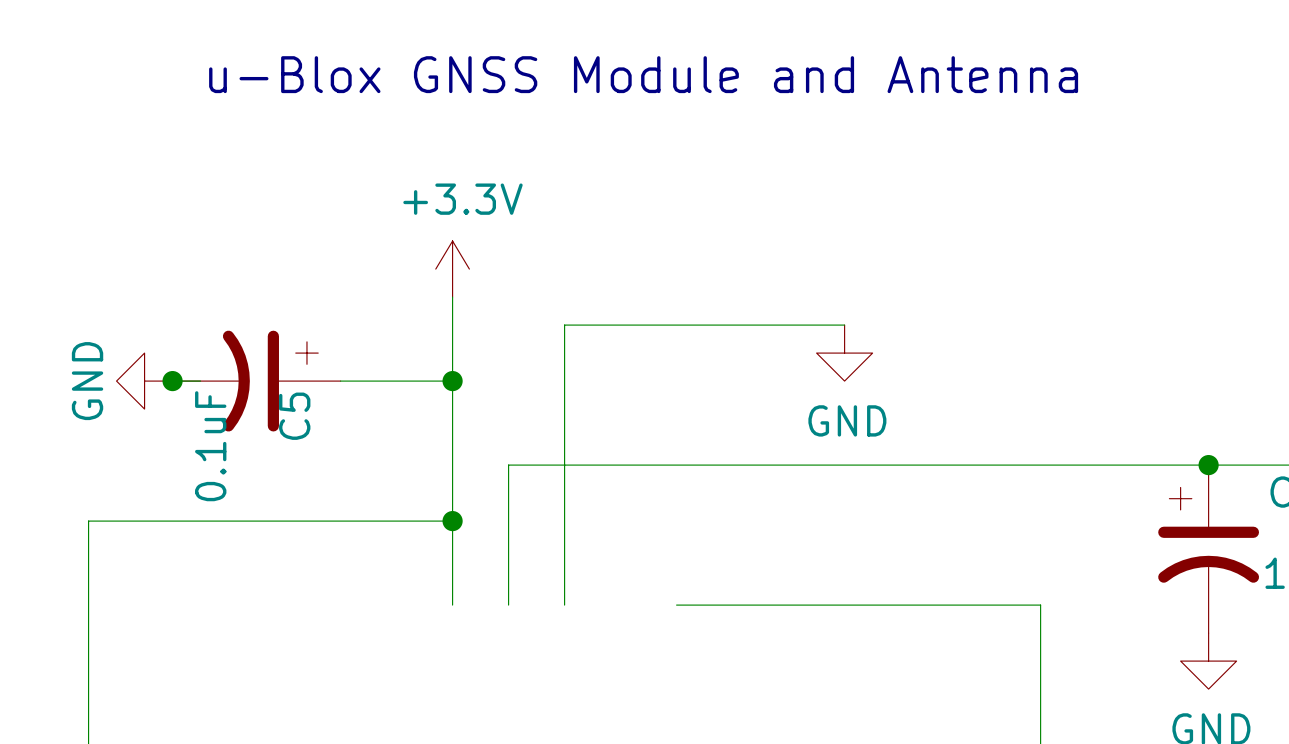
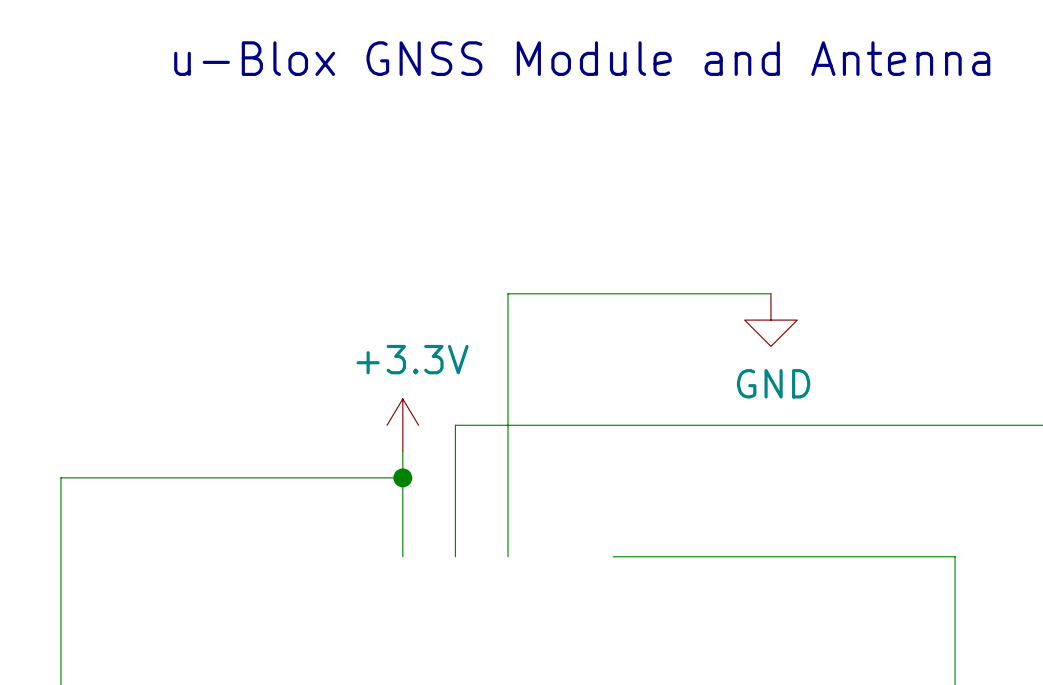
power symbol position: +3.3V (452, 269) -> +3.3V (402, 425)
wire: (452, 297) (452, 493) -> none
power symbol: GND (144, 381) -> none
wire: (172, 381) (200, 381) -> none
junction: (172, 381) -> none
C5: 0.1uF (256, 381) -> none
wire: (340, 381) (452, 381) -> none
junction: (452, 381) -> none

